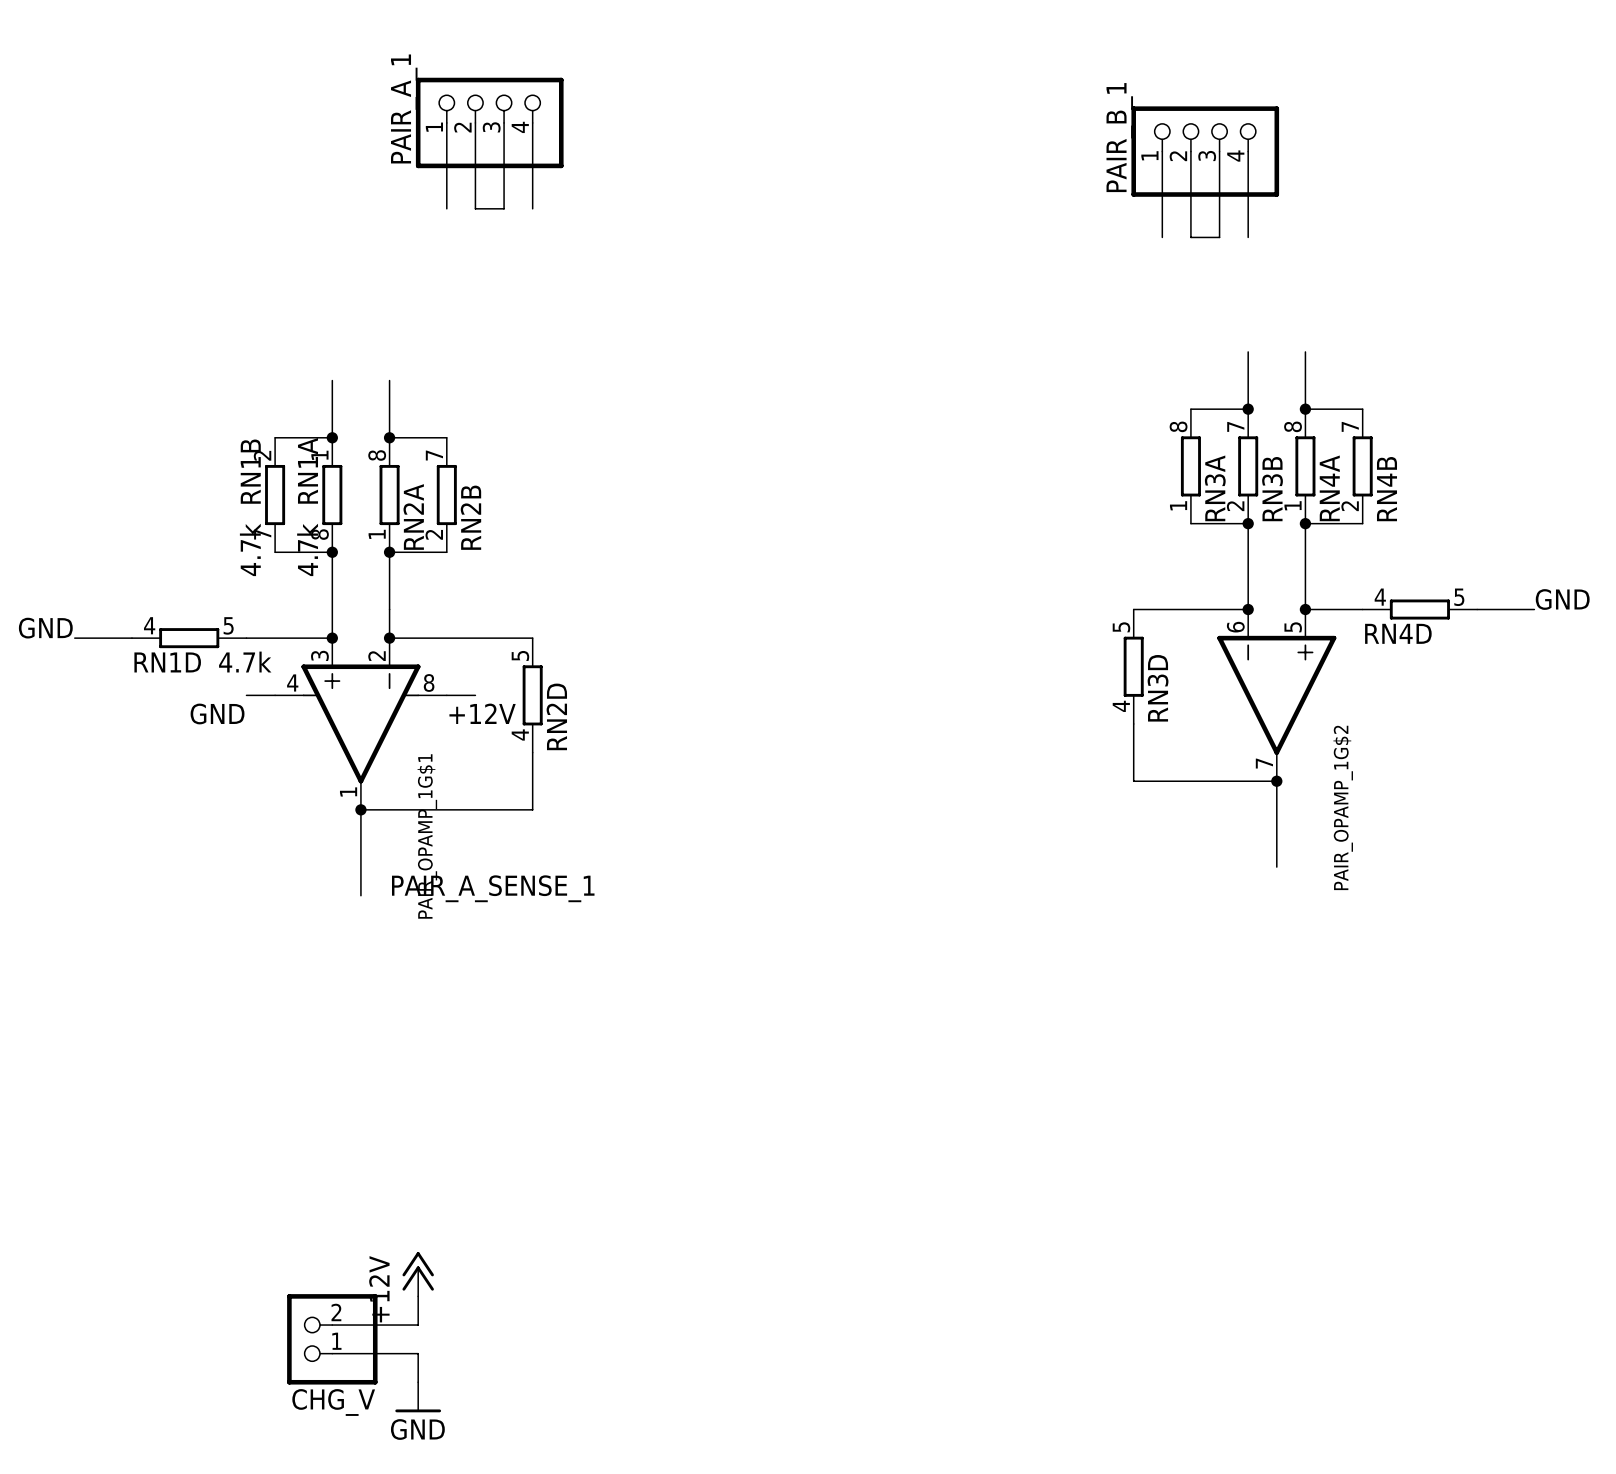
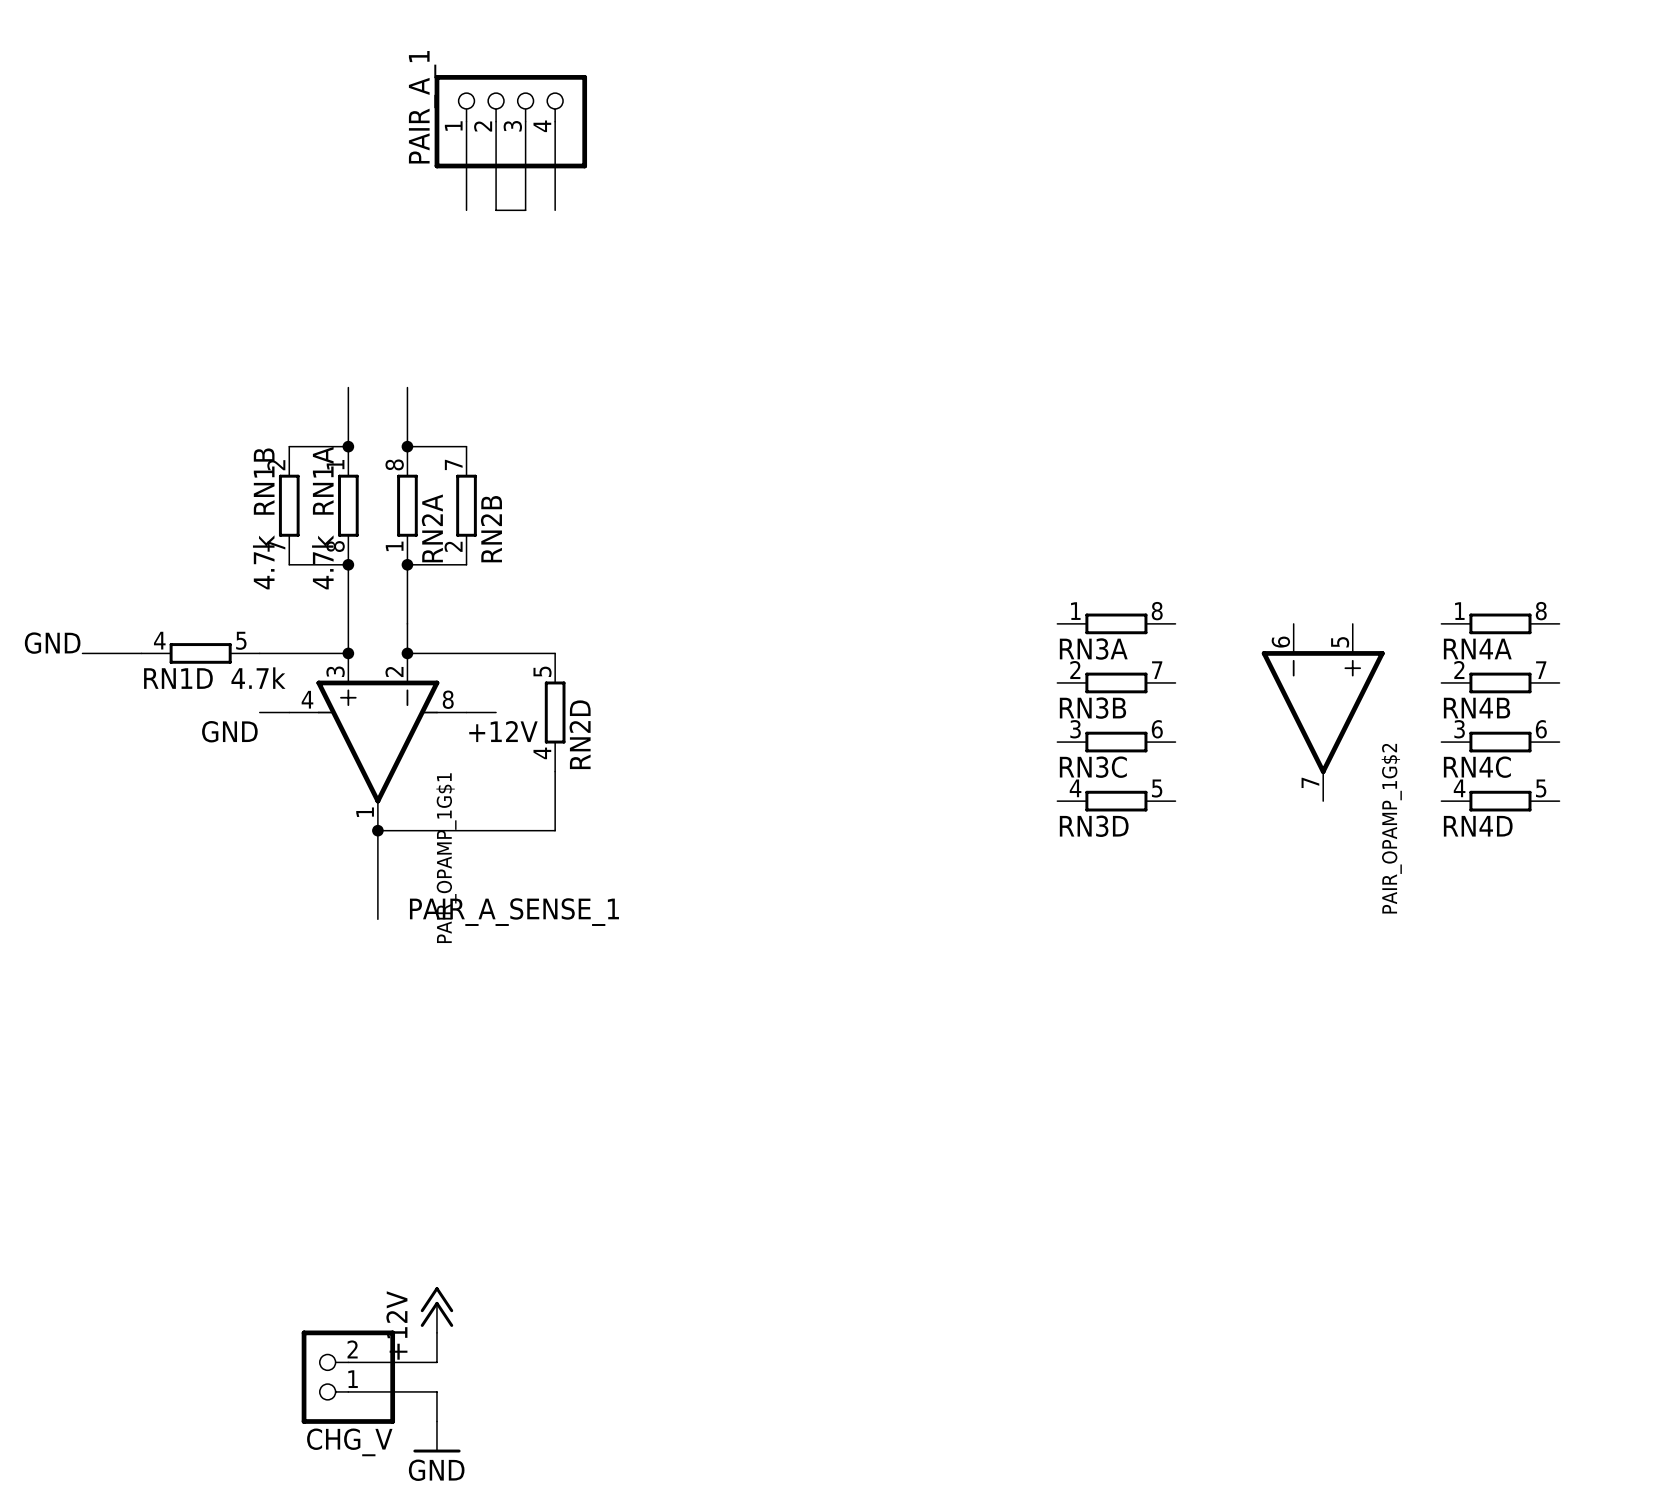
wire: (1162, 151) (1162, 237) -> none
wire: (1190, 151) (1190, 237) (1219, 237) (1219, 151) -> none
PAIR_B_1: (1205, 151) -> none
wire: (1248, 151) (1248, 237) -> none
wire: (1248, 351) (1248, 409) (1190, 409) -> none
wire: (1305, 351) (1305, 409) (1362, 409) -> none
junction: (1248, 409) -> none
junction: (1305, 409) -> none
RN3A rotation: 0° (1190, 466) -> 90° clockwise (1116, 623)
RN3A position: (1190, 466) -> (1116, 623)
RN3B rotation: 0° (1248, 466) -> 90° clockwise (1116, 682)
RN3B position: (1248, 466) -> (1116, 682)
RN4A rotation: 0° (1305, 466) -> 90° clockwise (1500, 623)
RN4A position: (1305, 466) -> (1500, 623)
RN4B rotation: 0° (1362, 466) -> 90° clockwise (1500, 682)
RN4B position: (1362, 466) -> (1500, 682)
wire: (1190, 523) (1248, 523) (1248, 609) (1133, 609) -> none
junction: (1248, 523) -> none
junction: (1305, 523) -> none
wire: (1362, 523) (1305, 523) (1305, 609) (1362, 609) -> none
label: GND (1562, 599) -> none
junction: (1248, 609) -> none
junction: (1305, 609) -> none
RN4D position: (1419, 609) -> (1500, 801)
wire: (1477, 609) (1534, 609) -> none
RN3D rotation: 0° (1133, 666) -> 90° clockwise (1116, 801)
RN3D position: (1133, 666) -> (1116, 801)
RN3C: none -> (1116, 742)
wire: (1133, 723) (1133, 781) (1276, 781) (1276, 867) -> none
RN4C: none -> (1500, 742)
junction: (1276, 781) -> none

